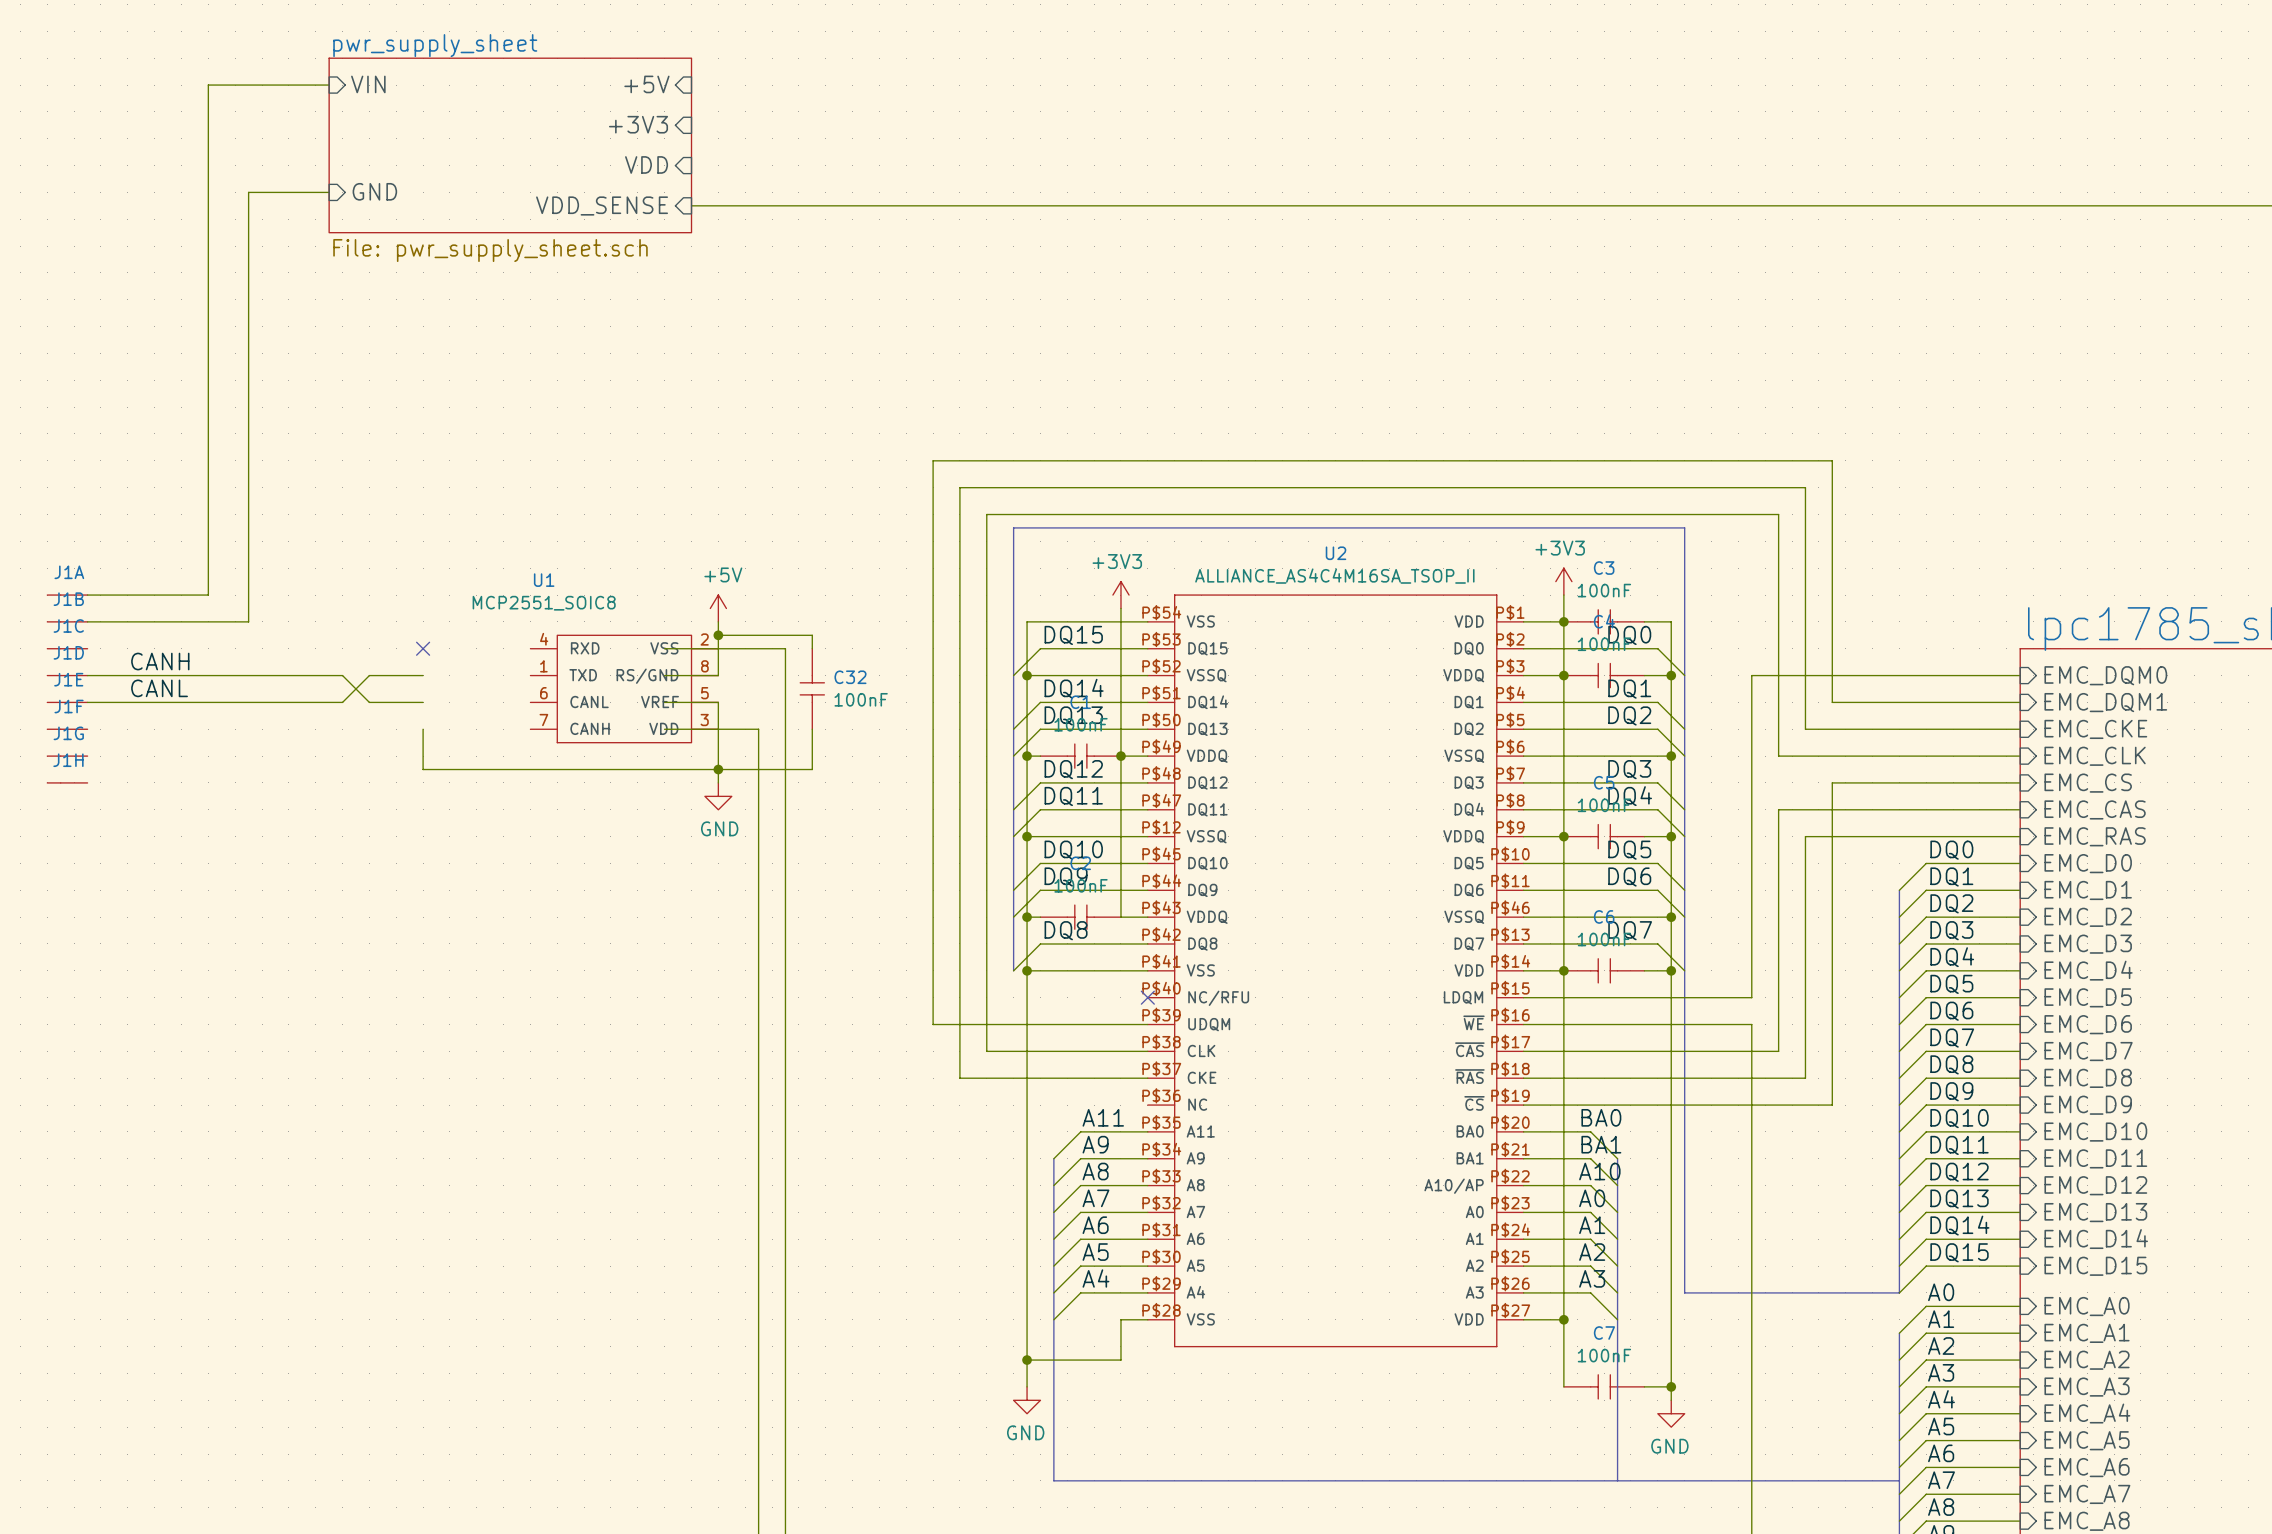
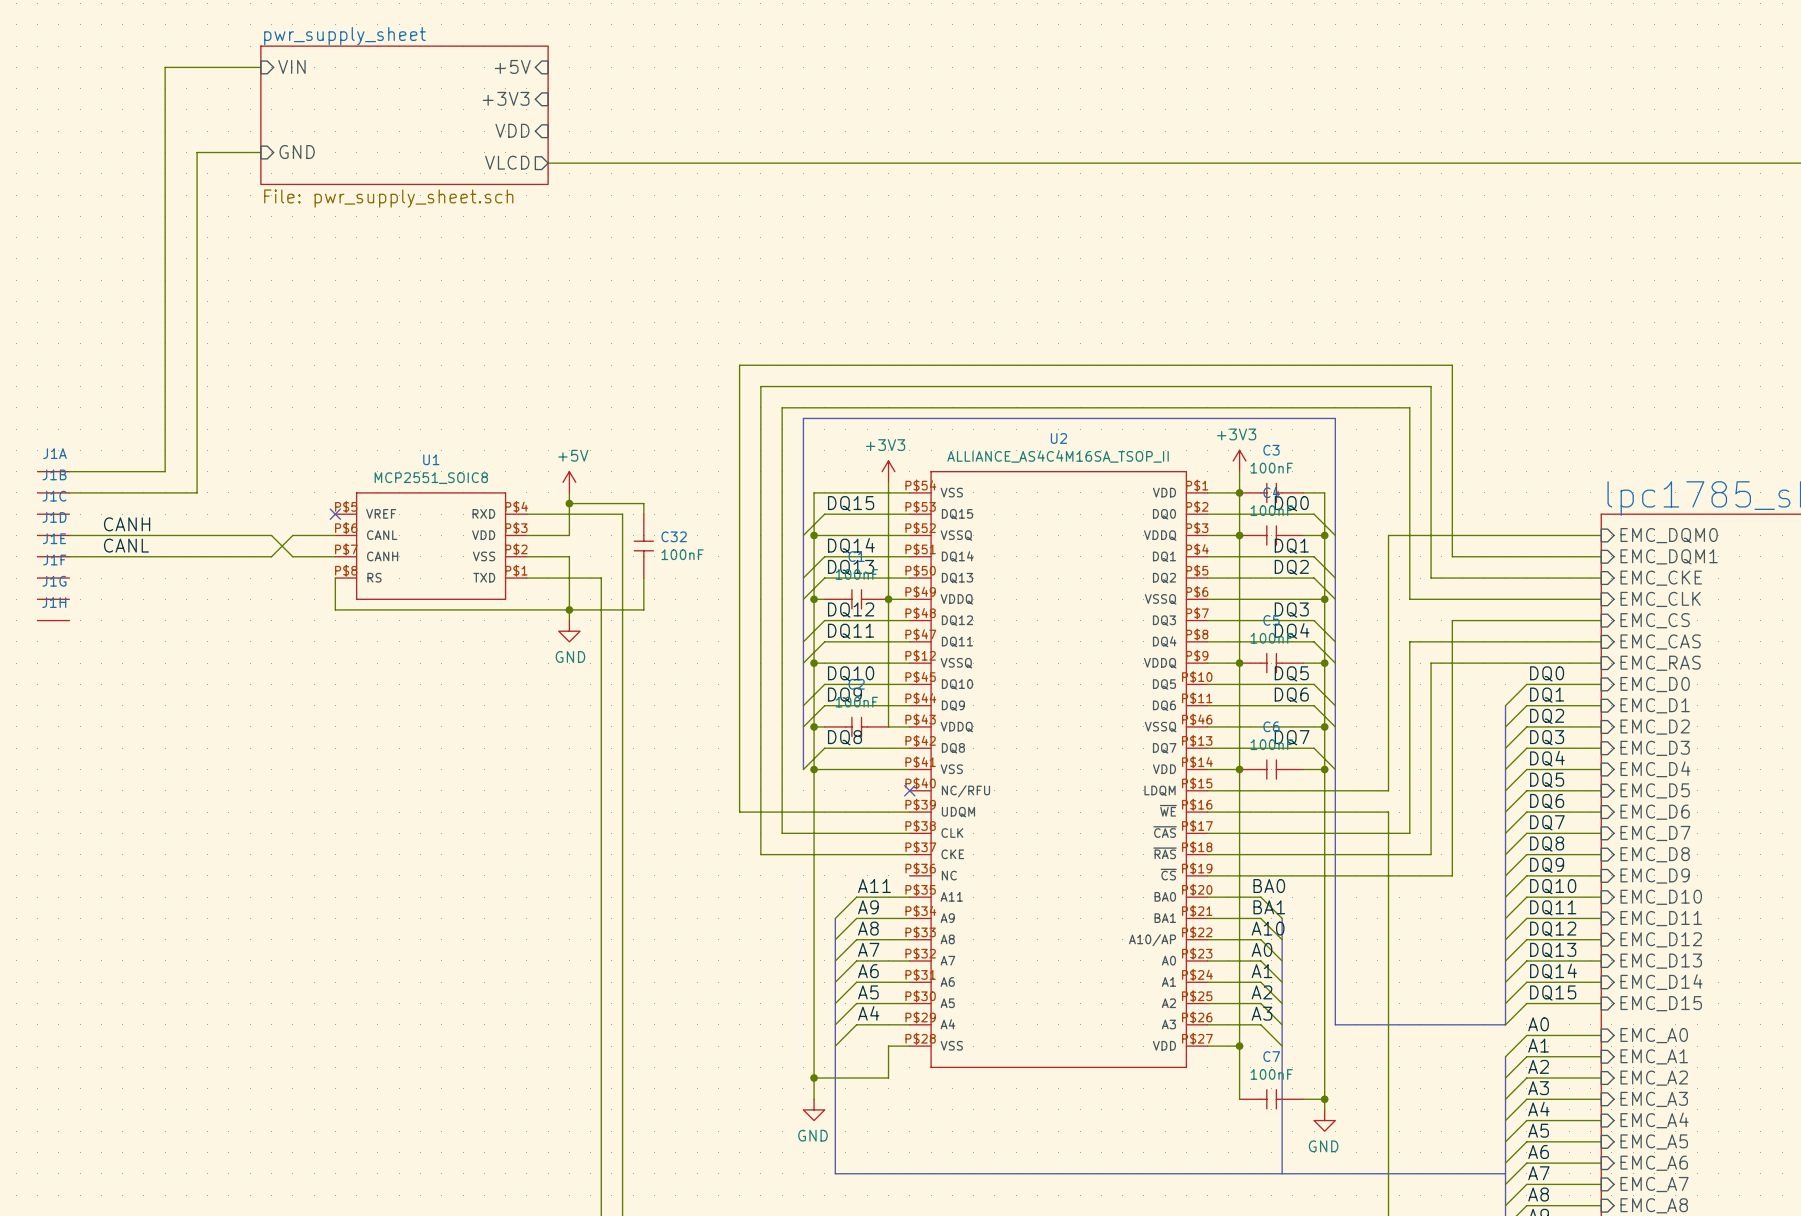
sheet pin shape: input (602, 206) -> output (507, 162)
sheet pin: VDD_SENSE (602, 206) -> VLCD (507, 162)
U1 symbol: [530, 635, 719, 743] -> [335, 492, 527, 600]

